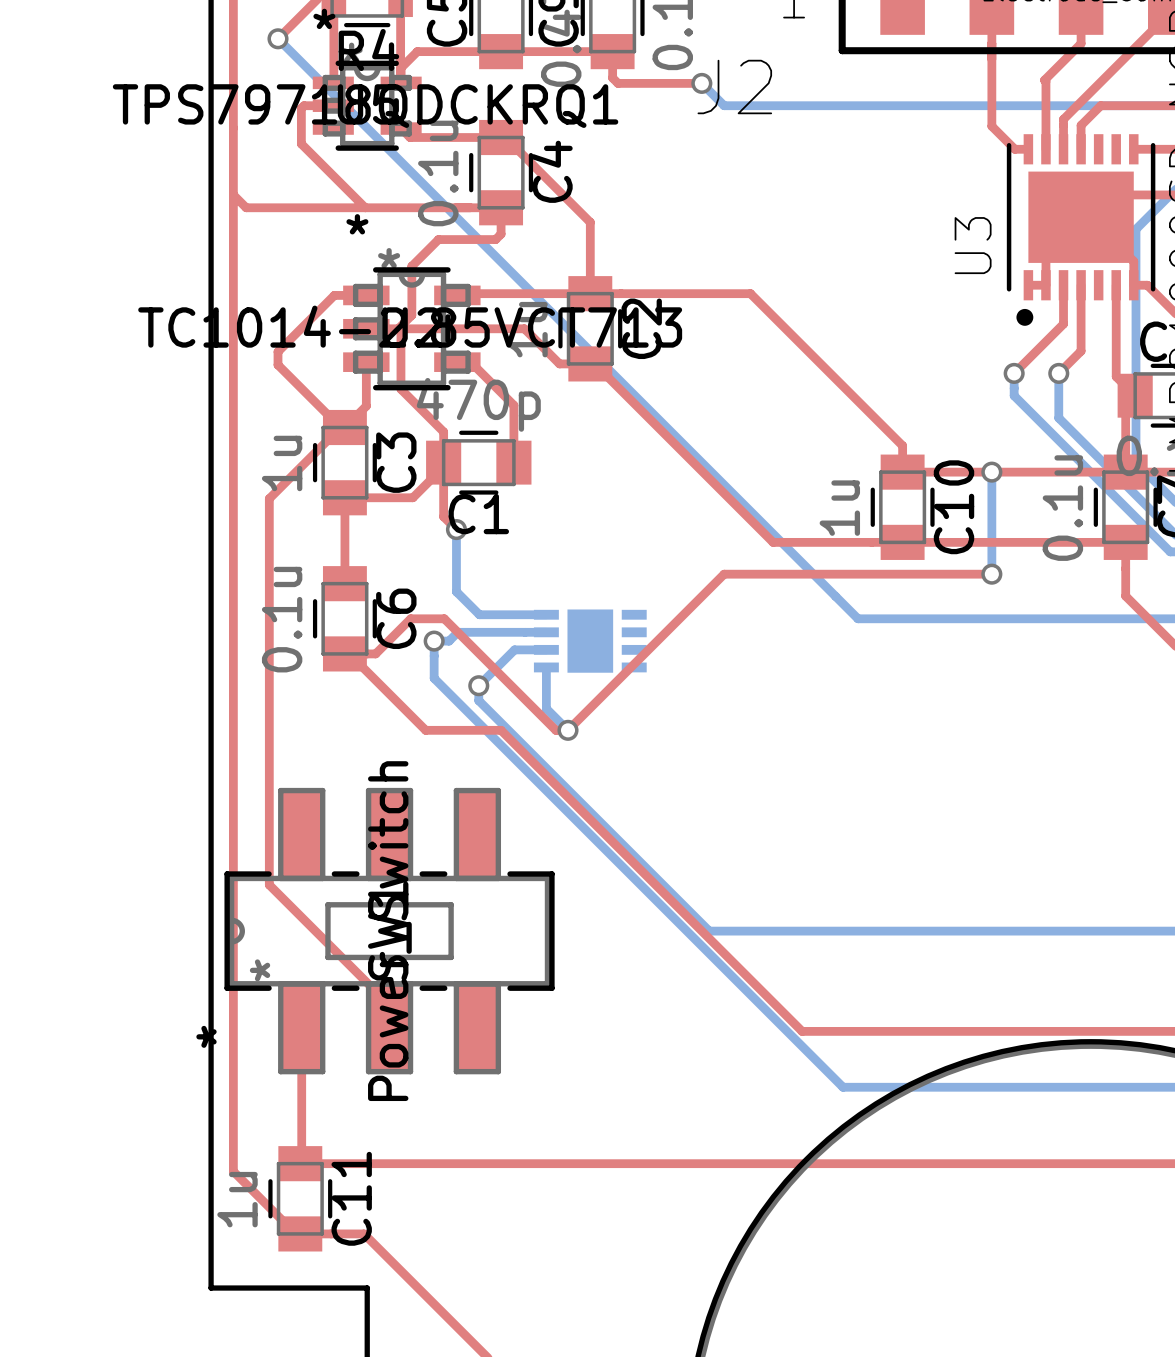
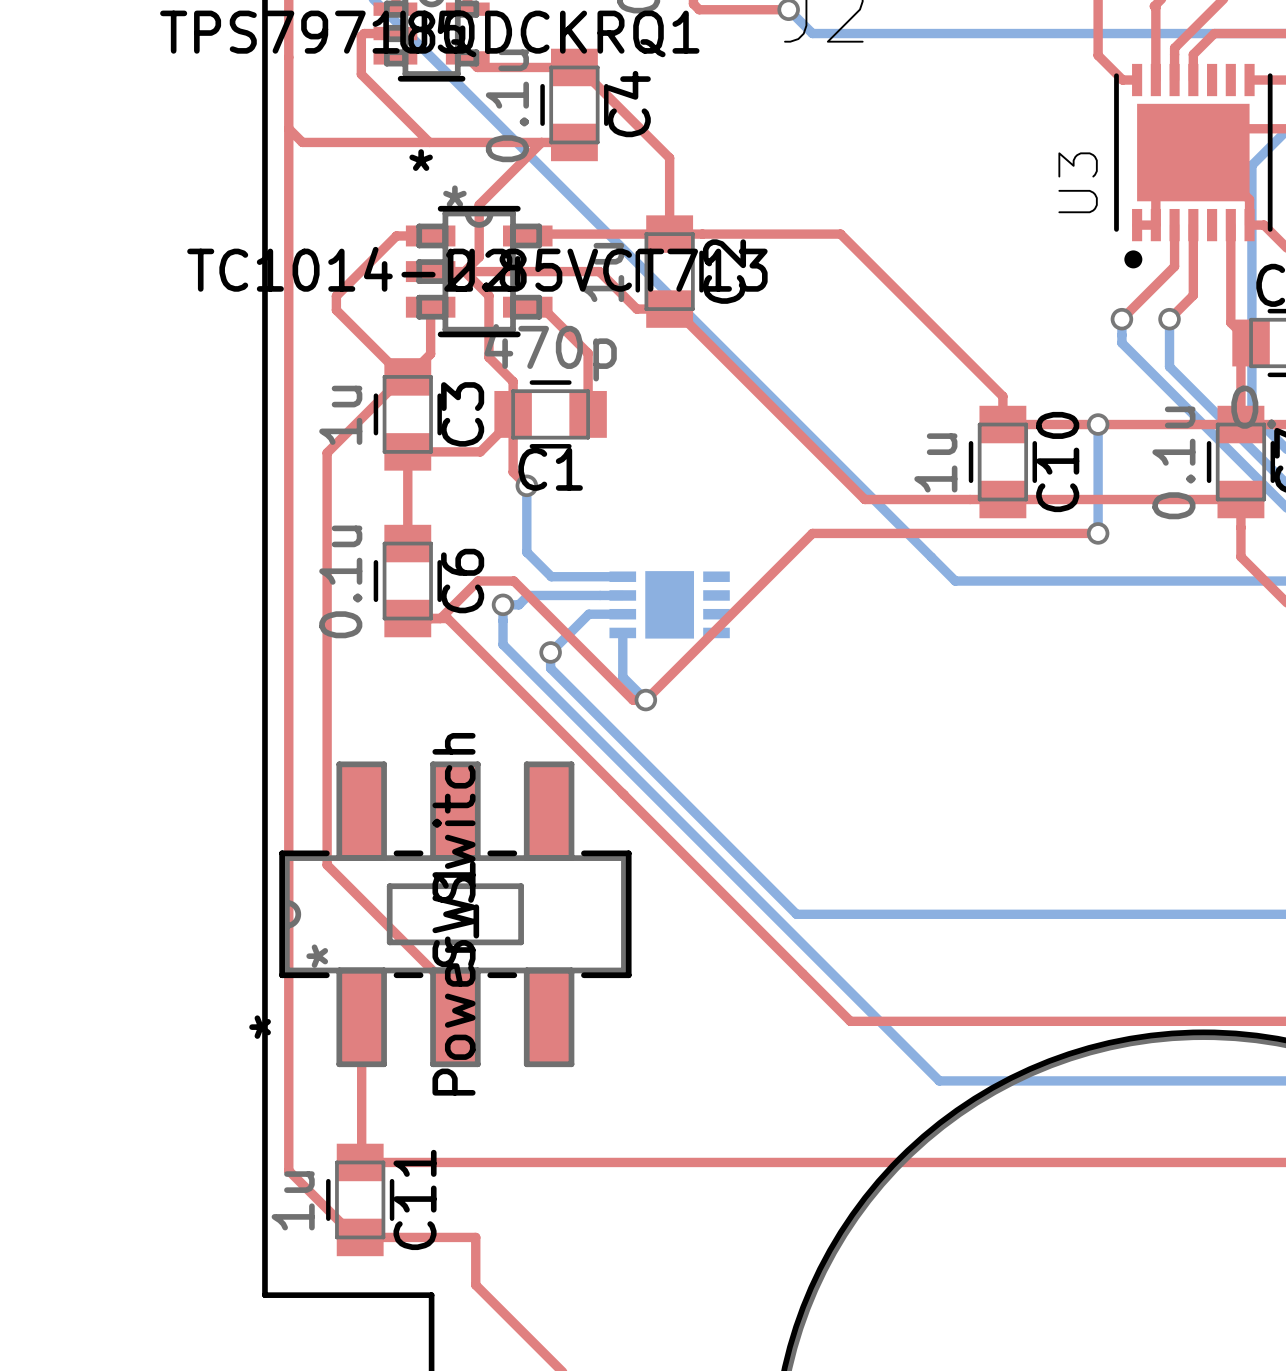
top track: (501, 207) (501, 234) (495, 239) (438, 239) -> (541, 142) (507, 176)
top track: (400, 331) (400, 389) (420, 409) -> (467, 274) (488, 295) (488, 357)
top track: (349, 653) (425, 730) (501, 730) (802, 1031) -> (440, 618) (447, 618) (850, 1021) (895, 1021)
top track: (363, 1233) (408, 1278) -> (428, 1237) (475, 1237) (475, 1285)

